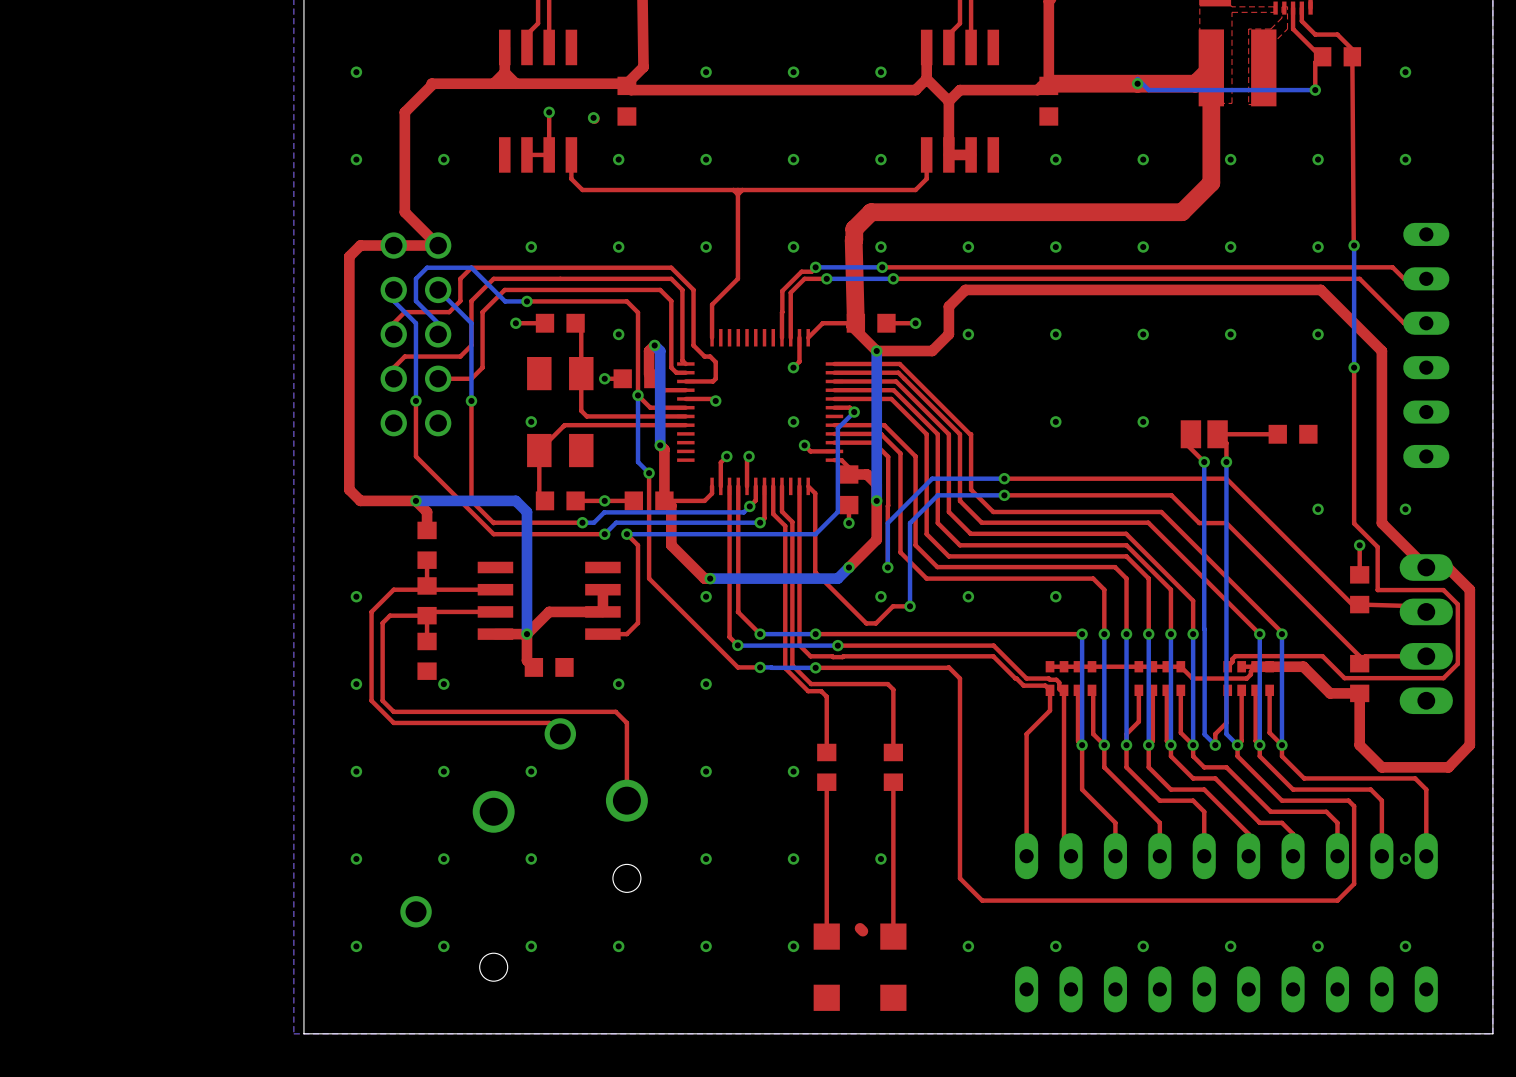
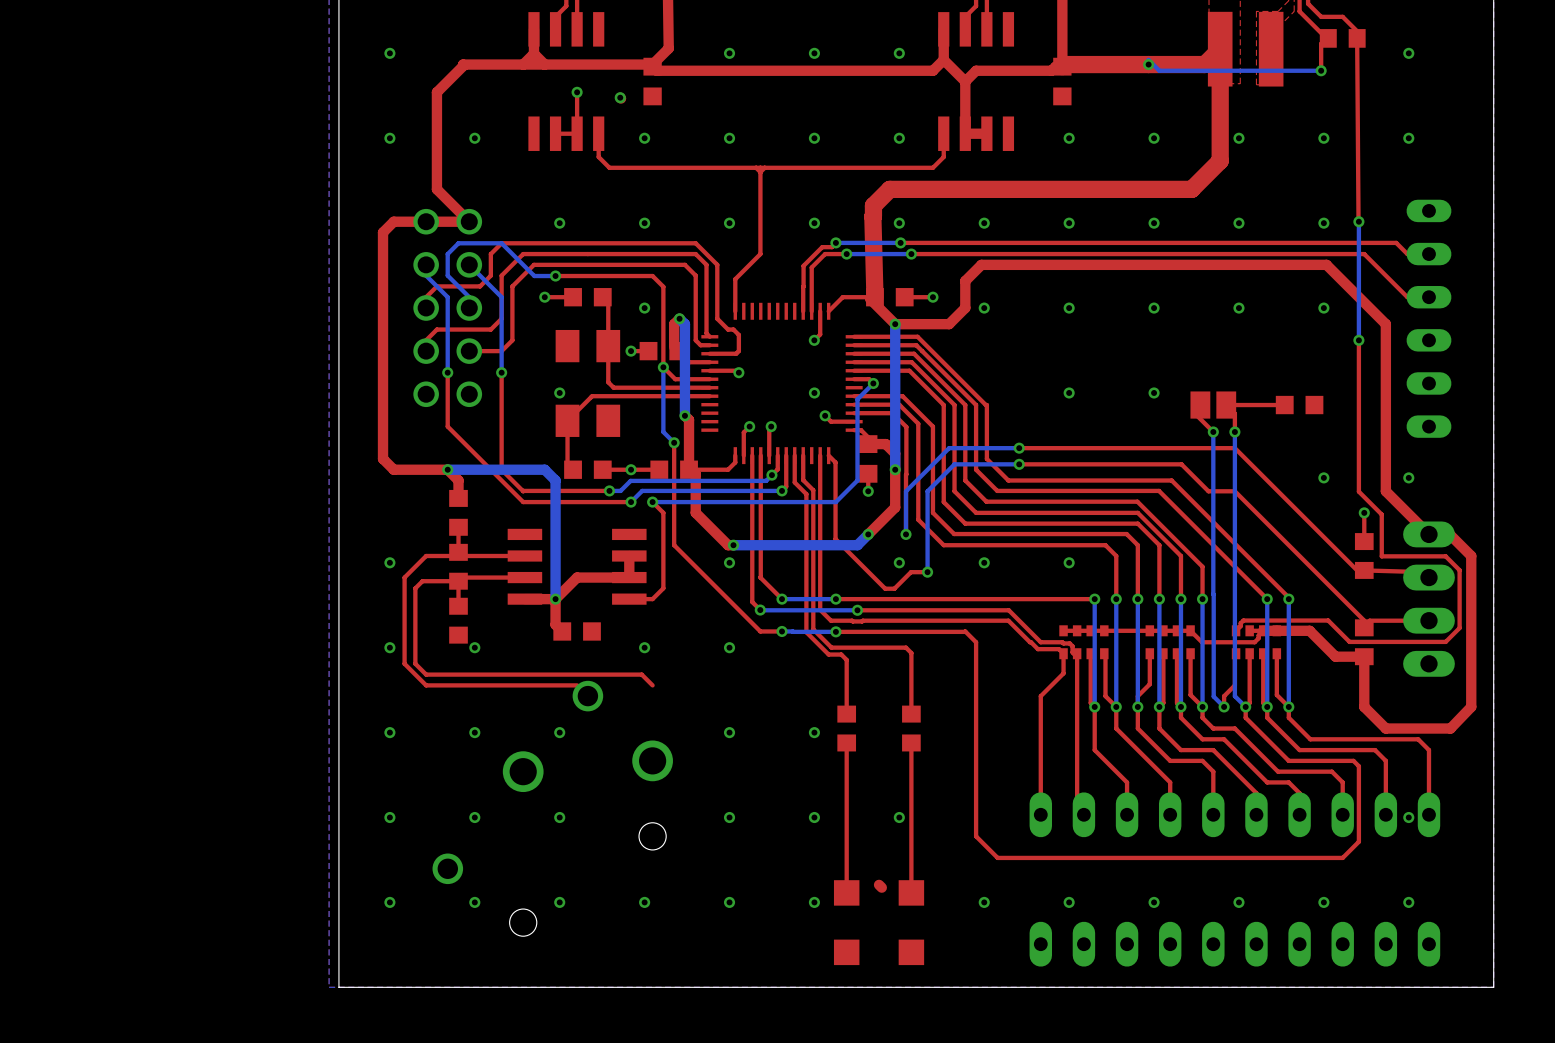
top track: (626, 722) (626, 800) -> none

